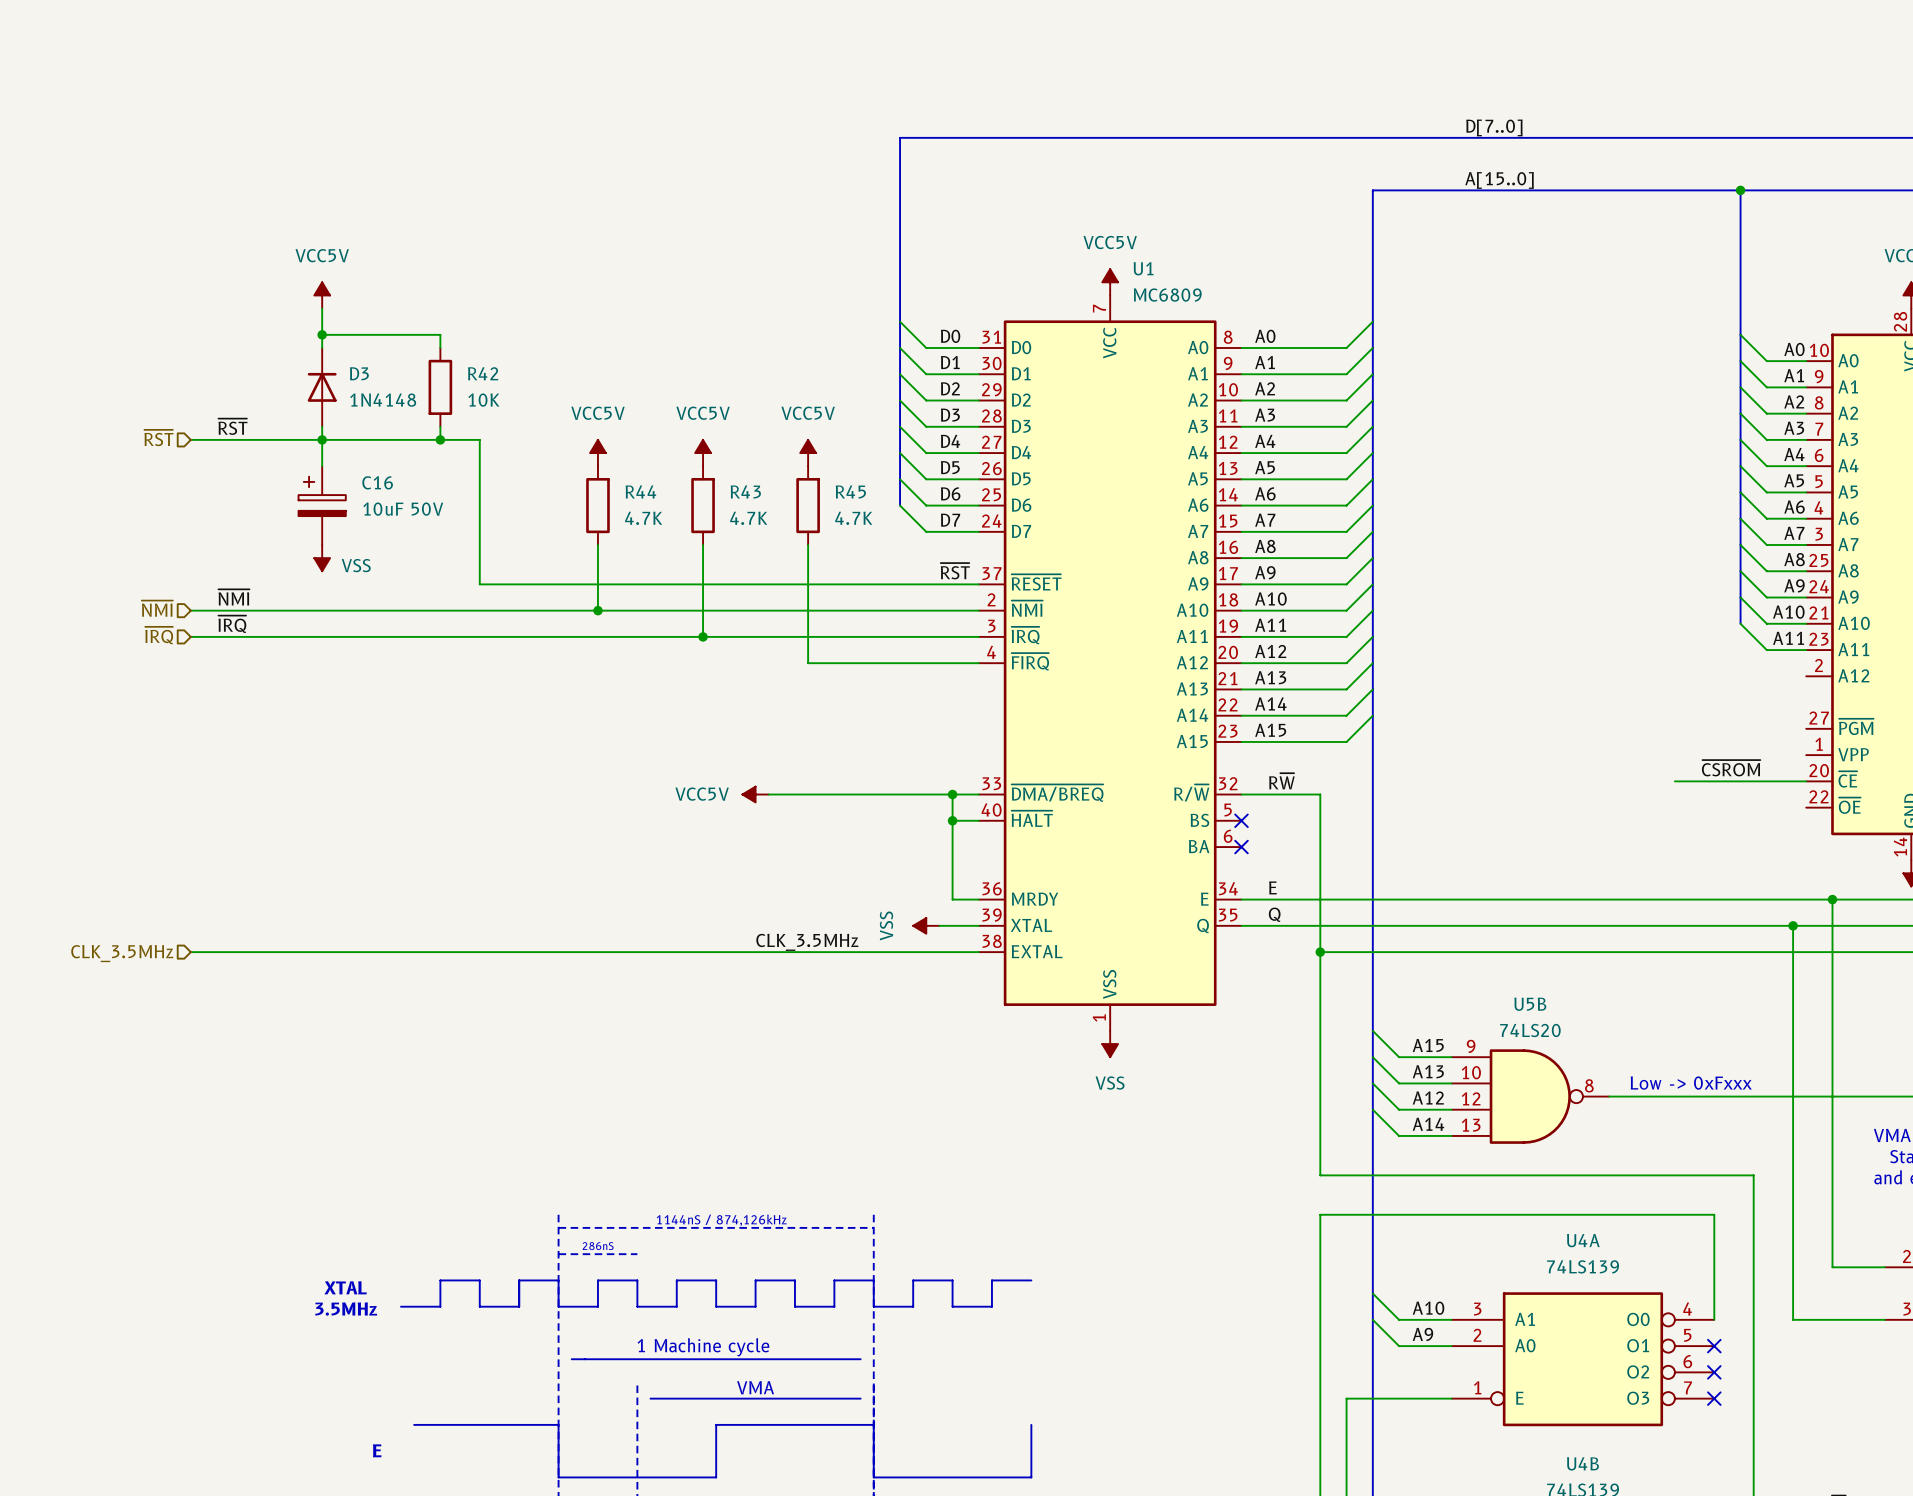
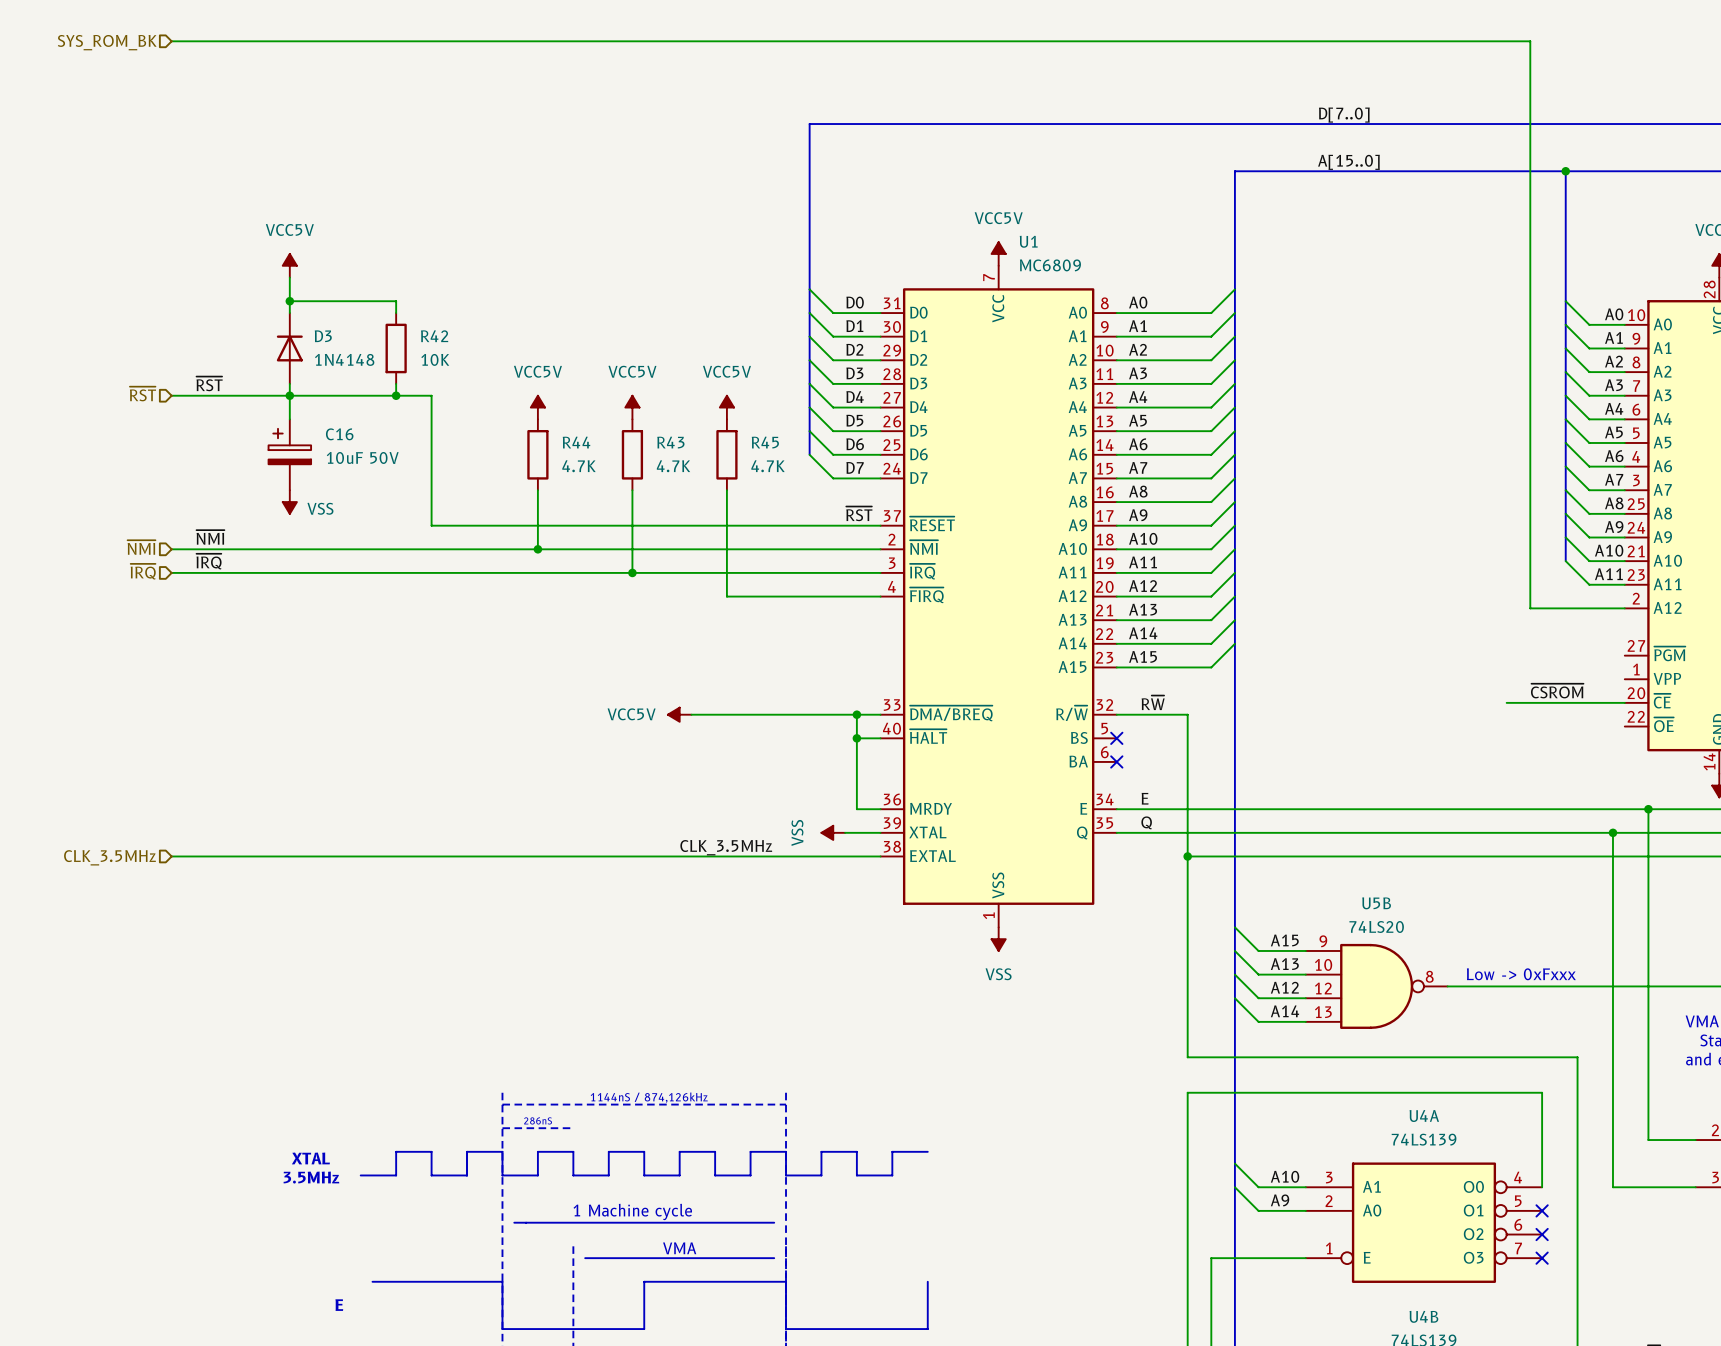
wire: none -> (171, 41) (1530, 41) (1530, 608) (1624, 608)
hierarchical label: none -> SYS_ROM_BK (107, 42)

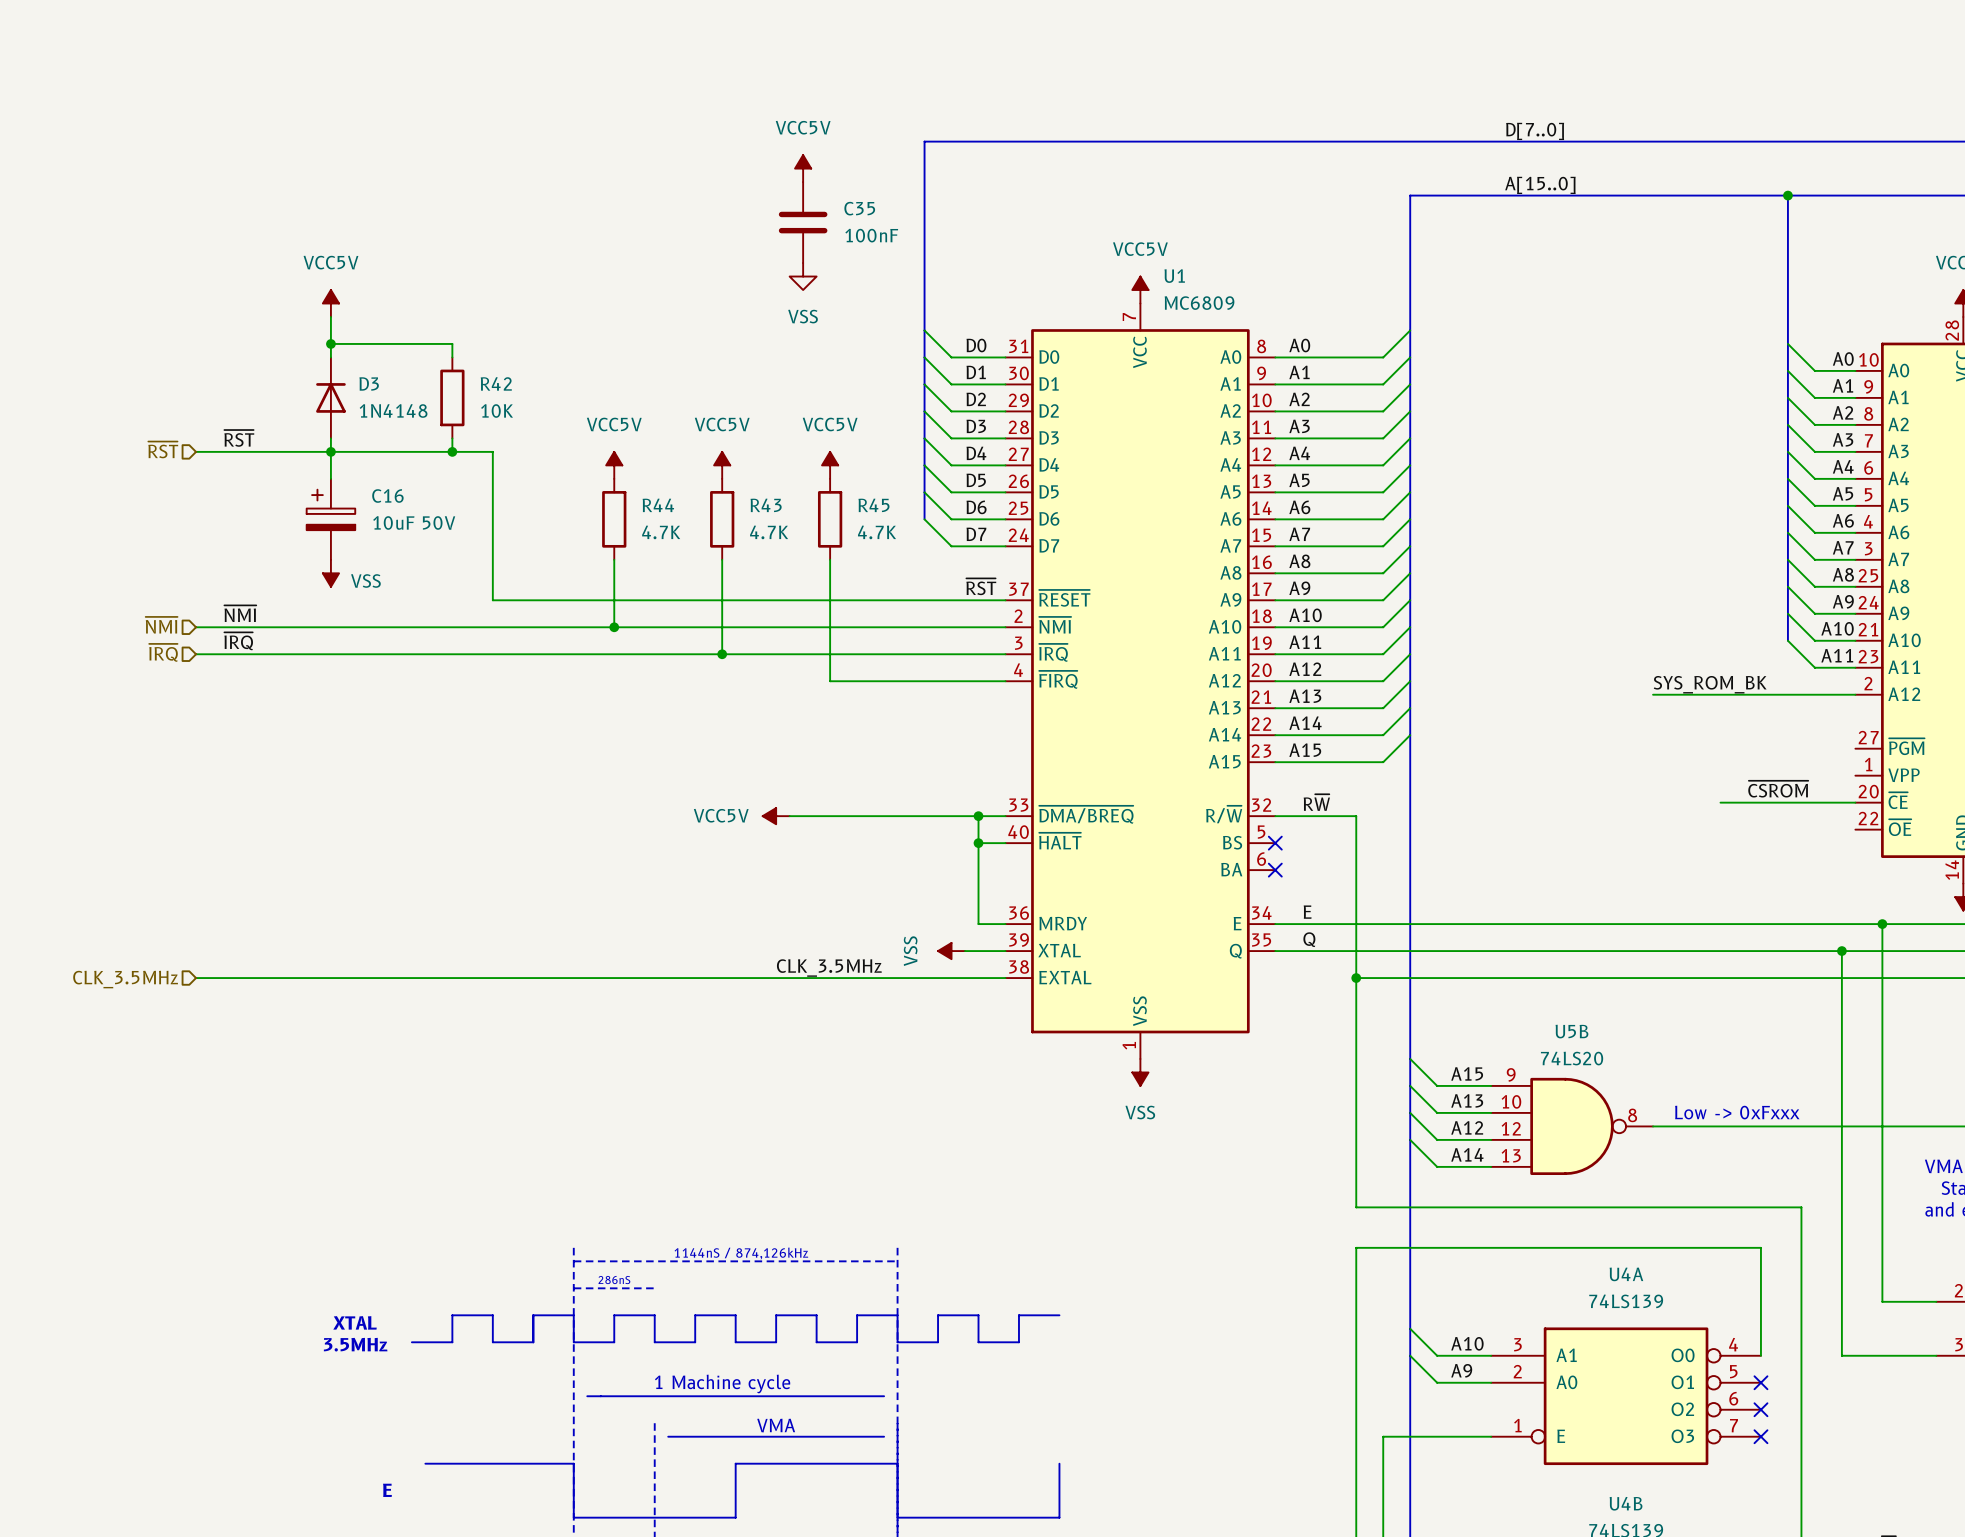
wire: (171, 41) (1530, 41) (1530, 608) -> (1653, 694) (1747, 694)
hierarchical label: SYS_ROM_BK (107, 42) -> none
power symbol: none -> VCC5V (803, 168)
C35: none -> 100nF (803, 222)
power symbol: none -> VSS (803, 276)
label: none -> SYS_ROM_BK (1710, 684)

